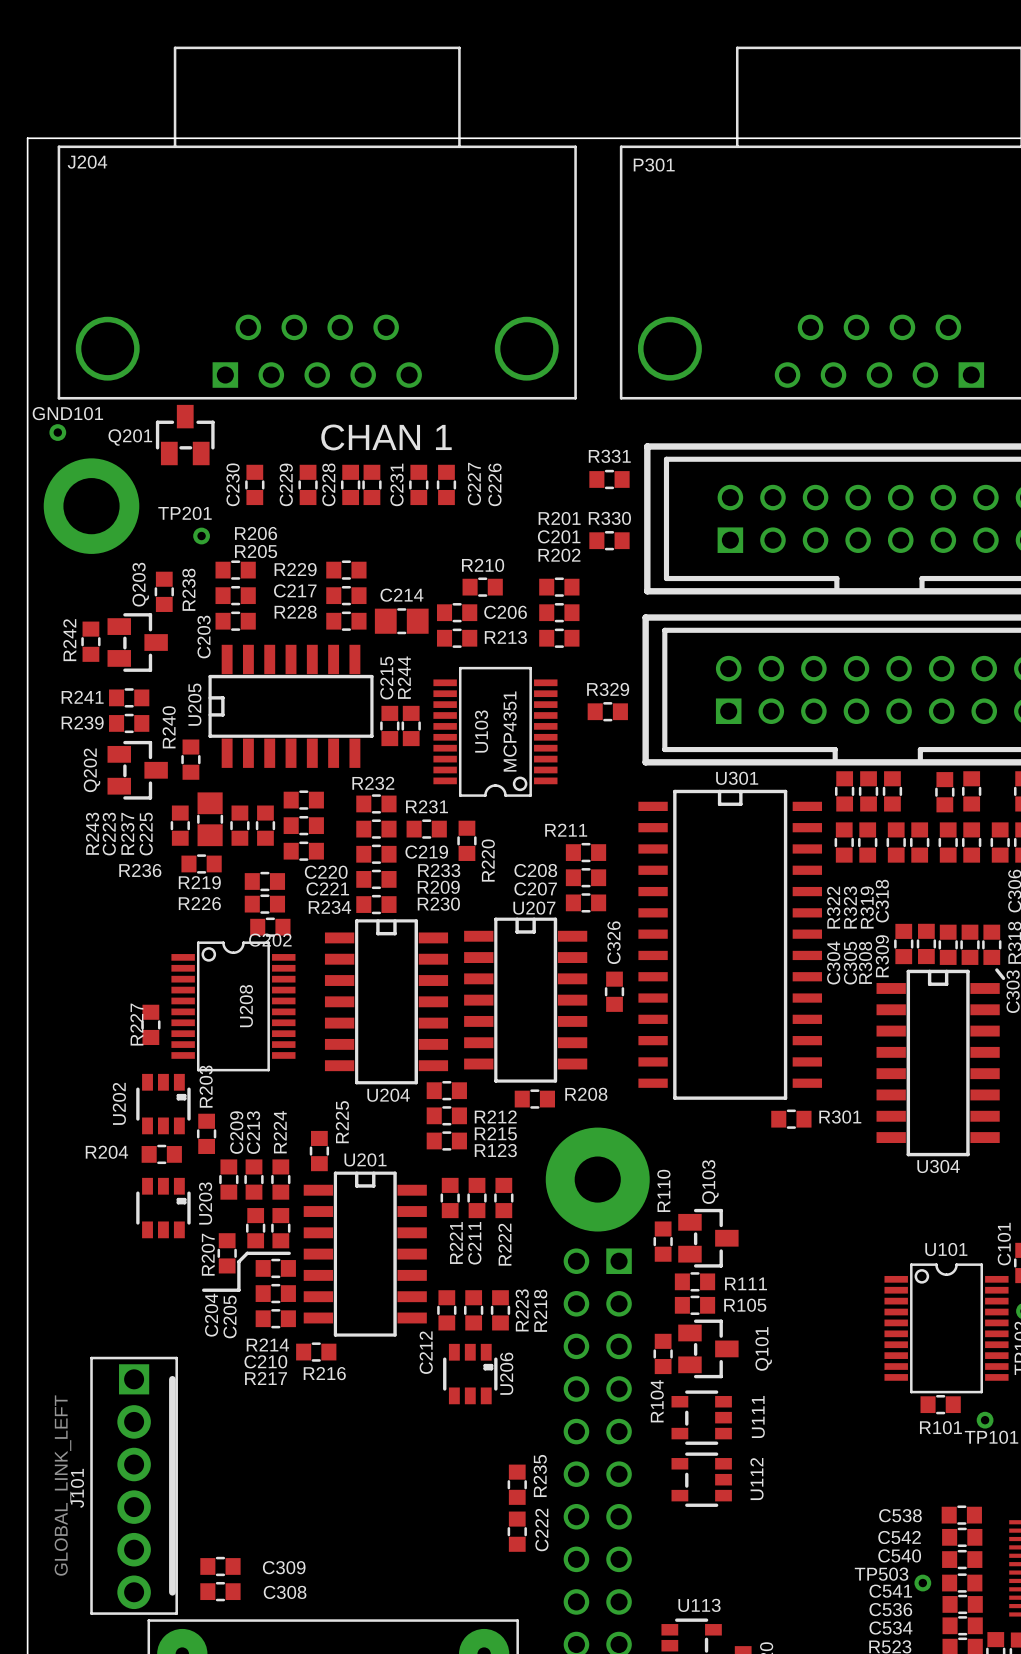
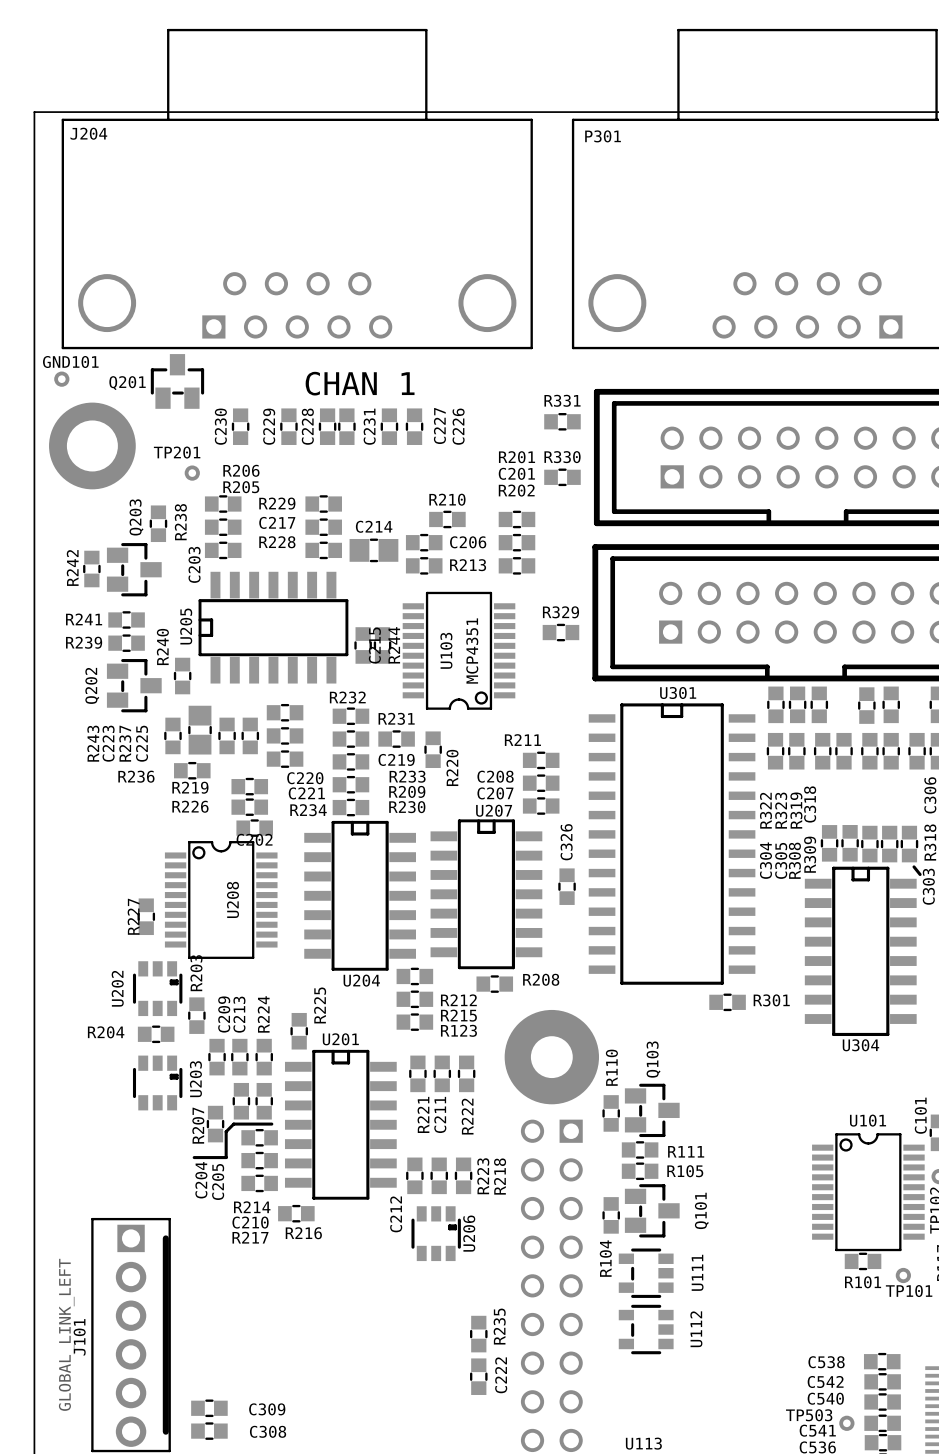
R244 name position: R244 (404, 677) -> R244 (394, 645)
C215 name position: C215 (386, 678) -> C215 (374, 645)

